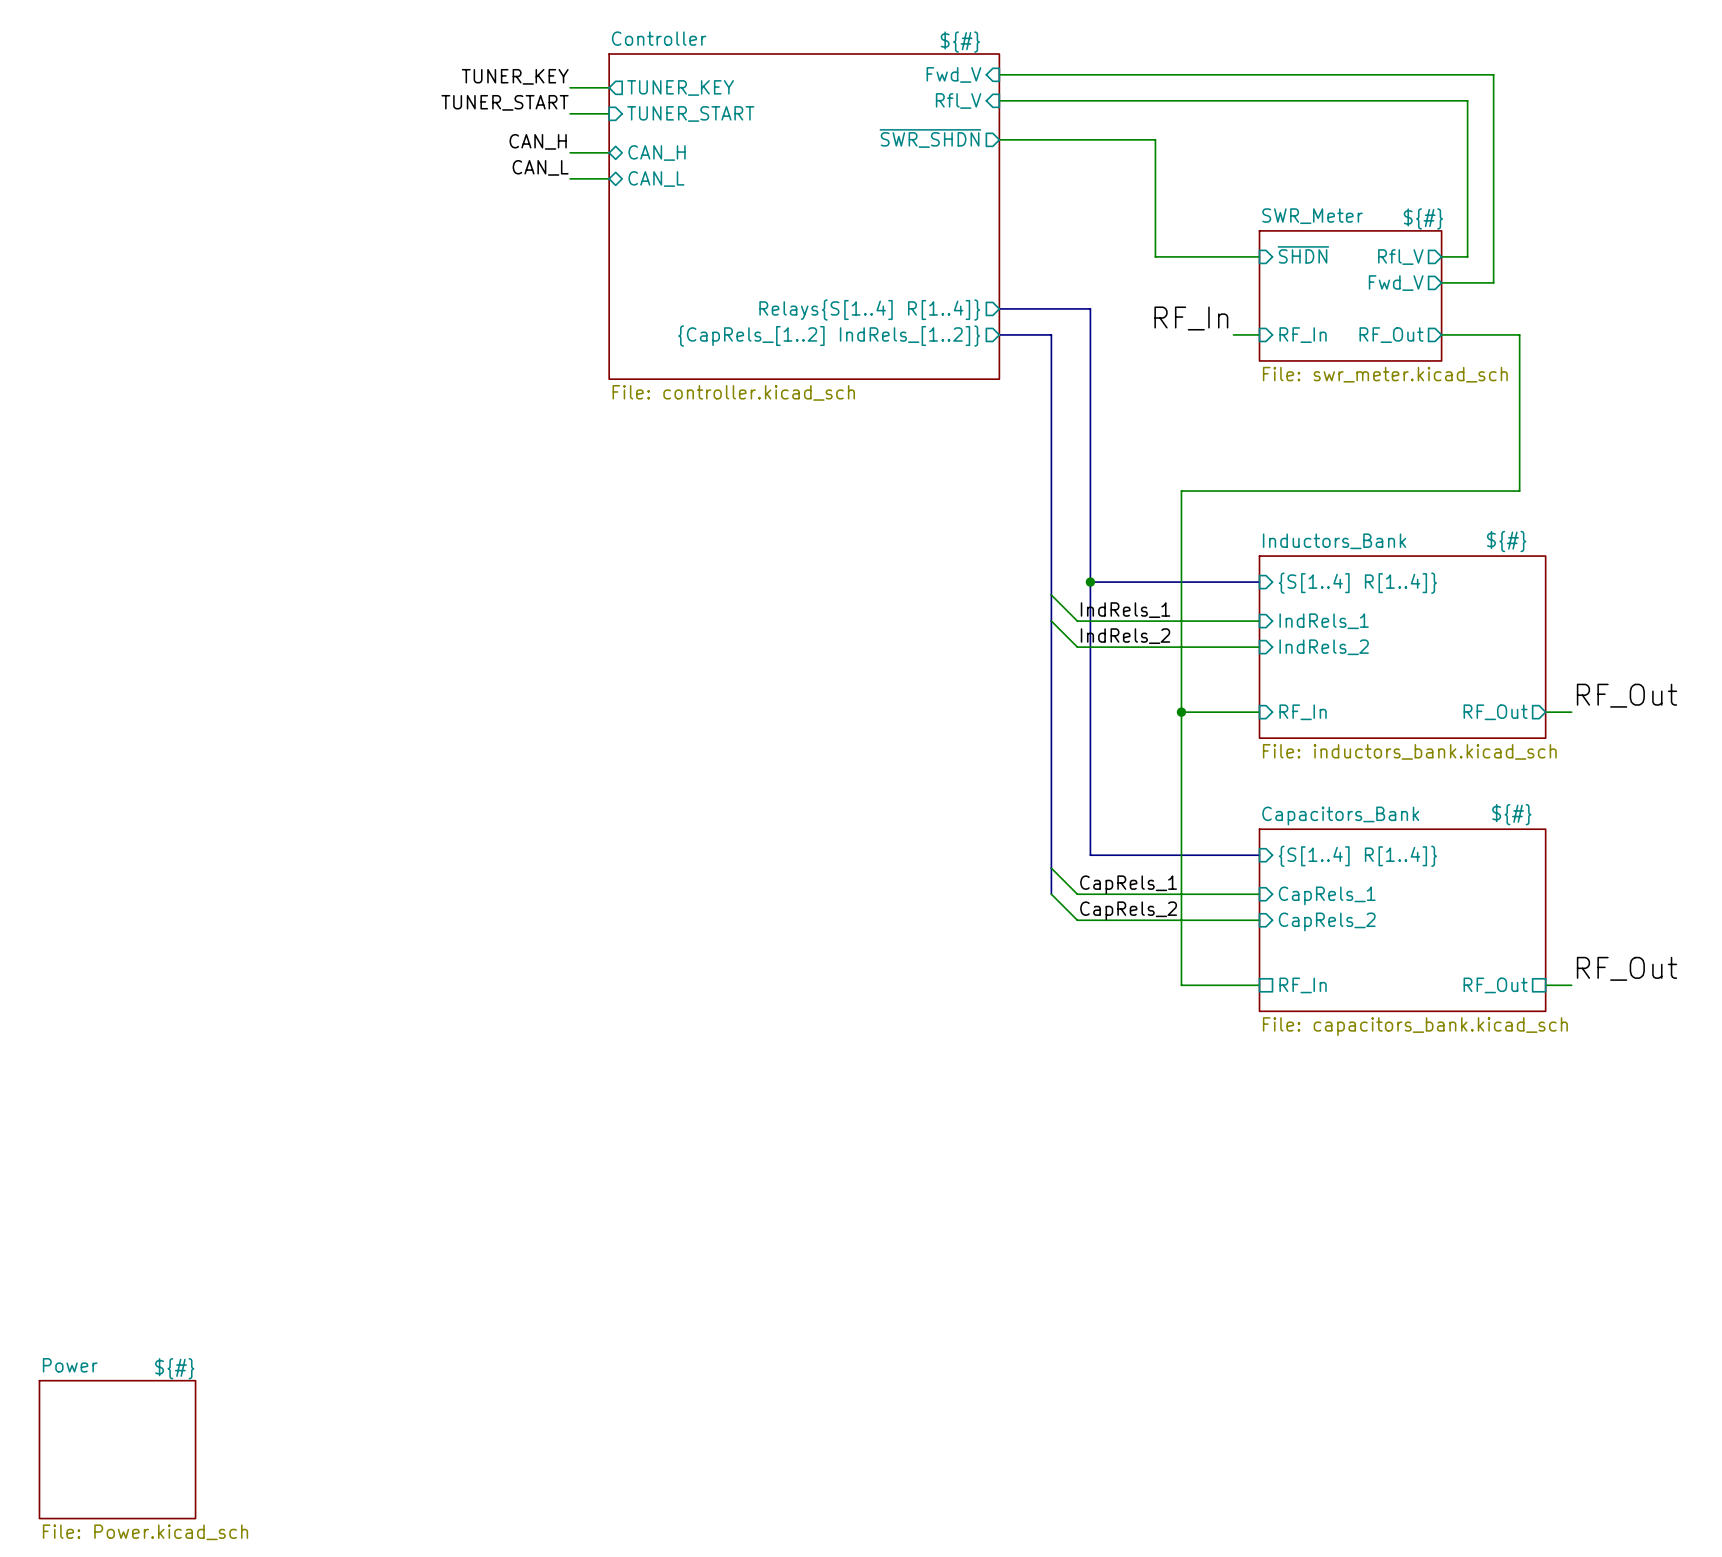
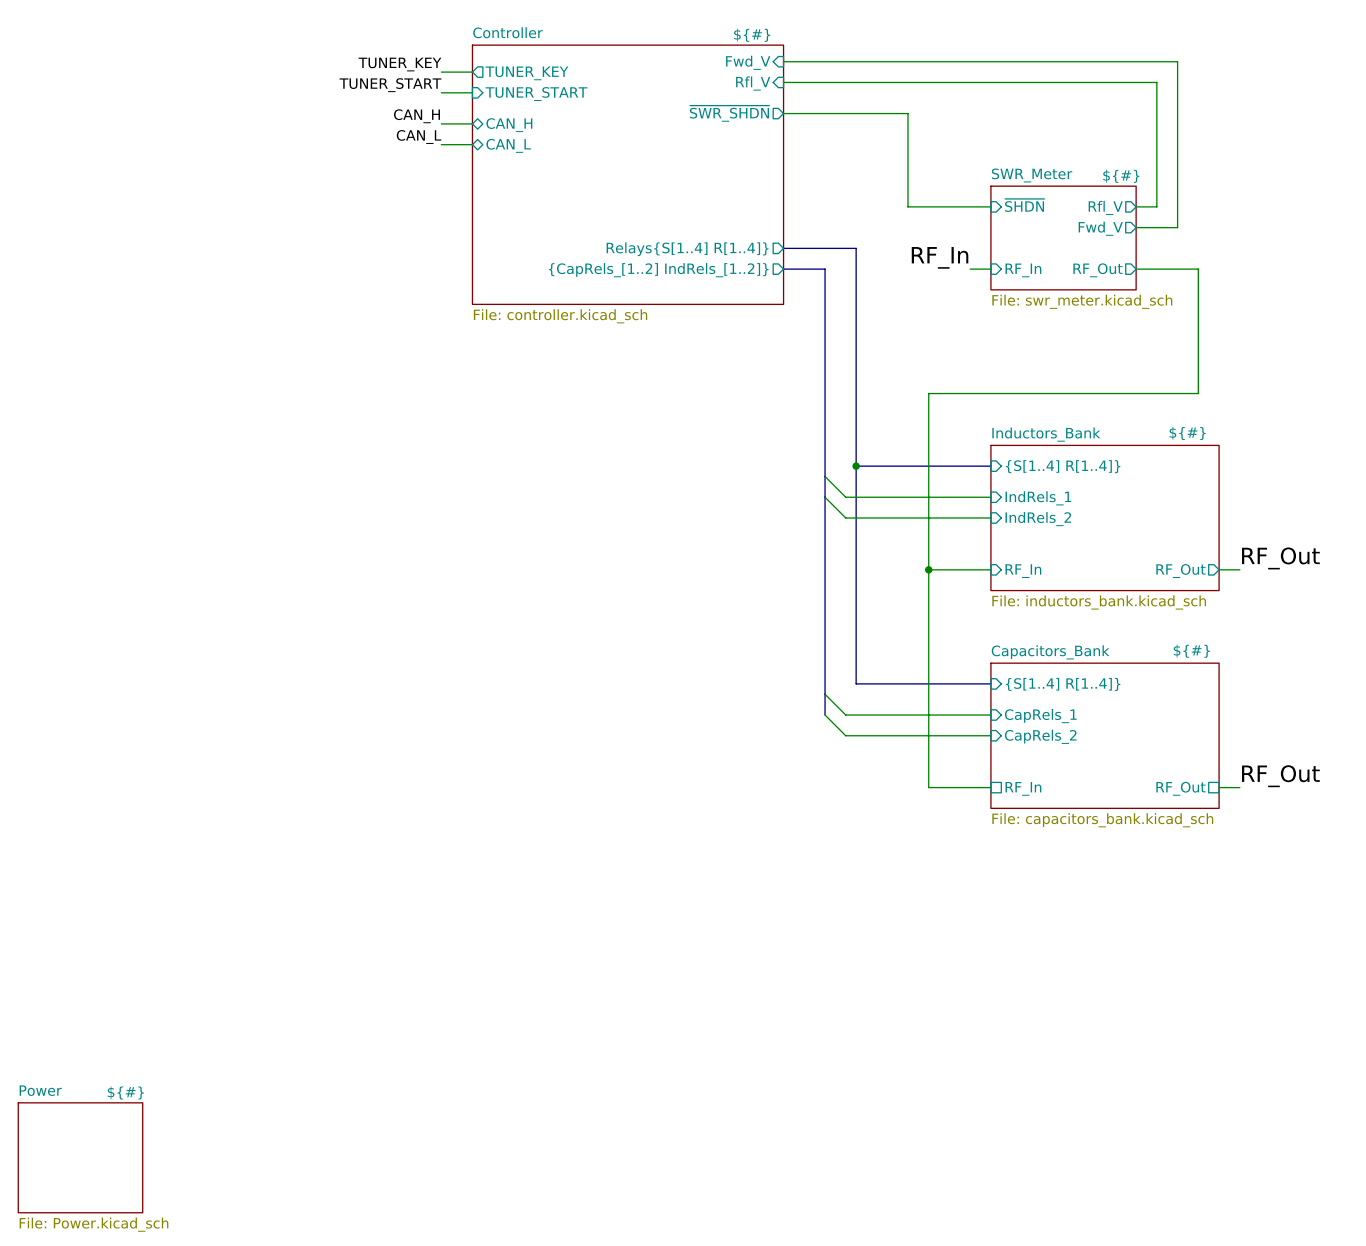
label: IndRels_1 (1125, 610) -> none
label: IndRels_2 (1125, 636) -> none
label: CapRels_1 (1128, 884) -> none
label: CapRels_2 (1128, 910) -> none

